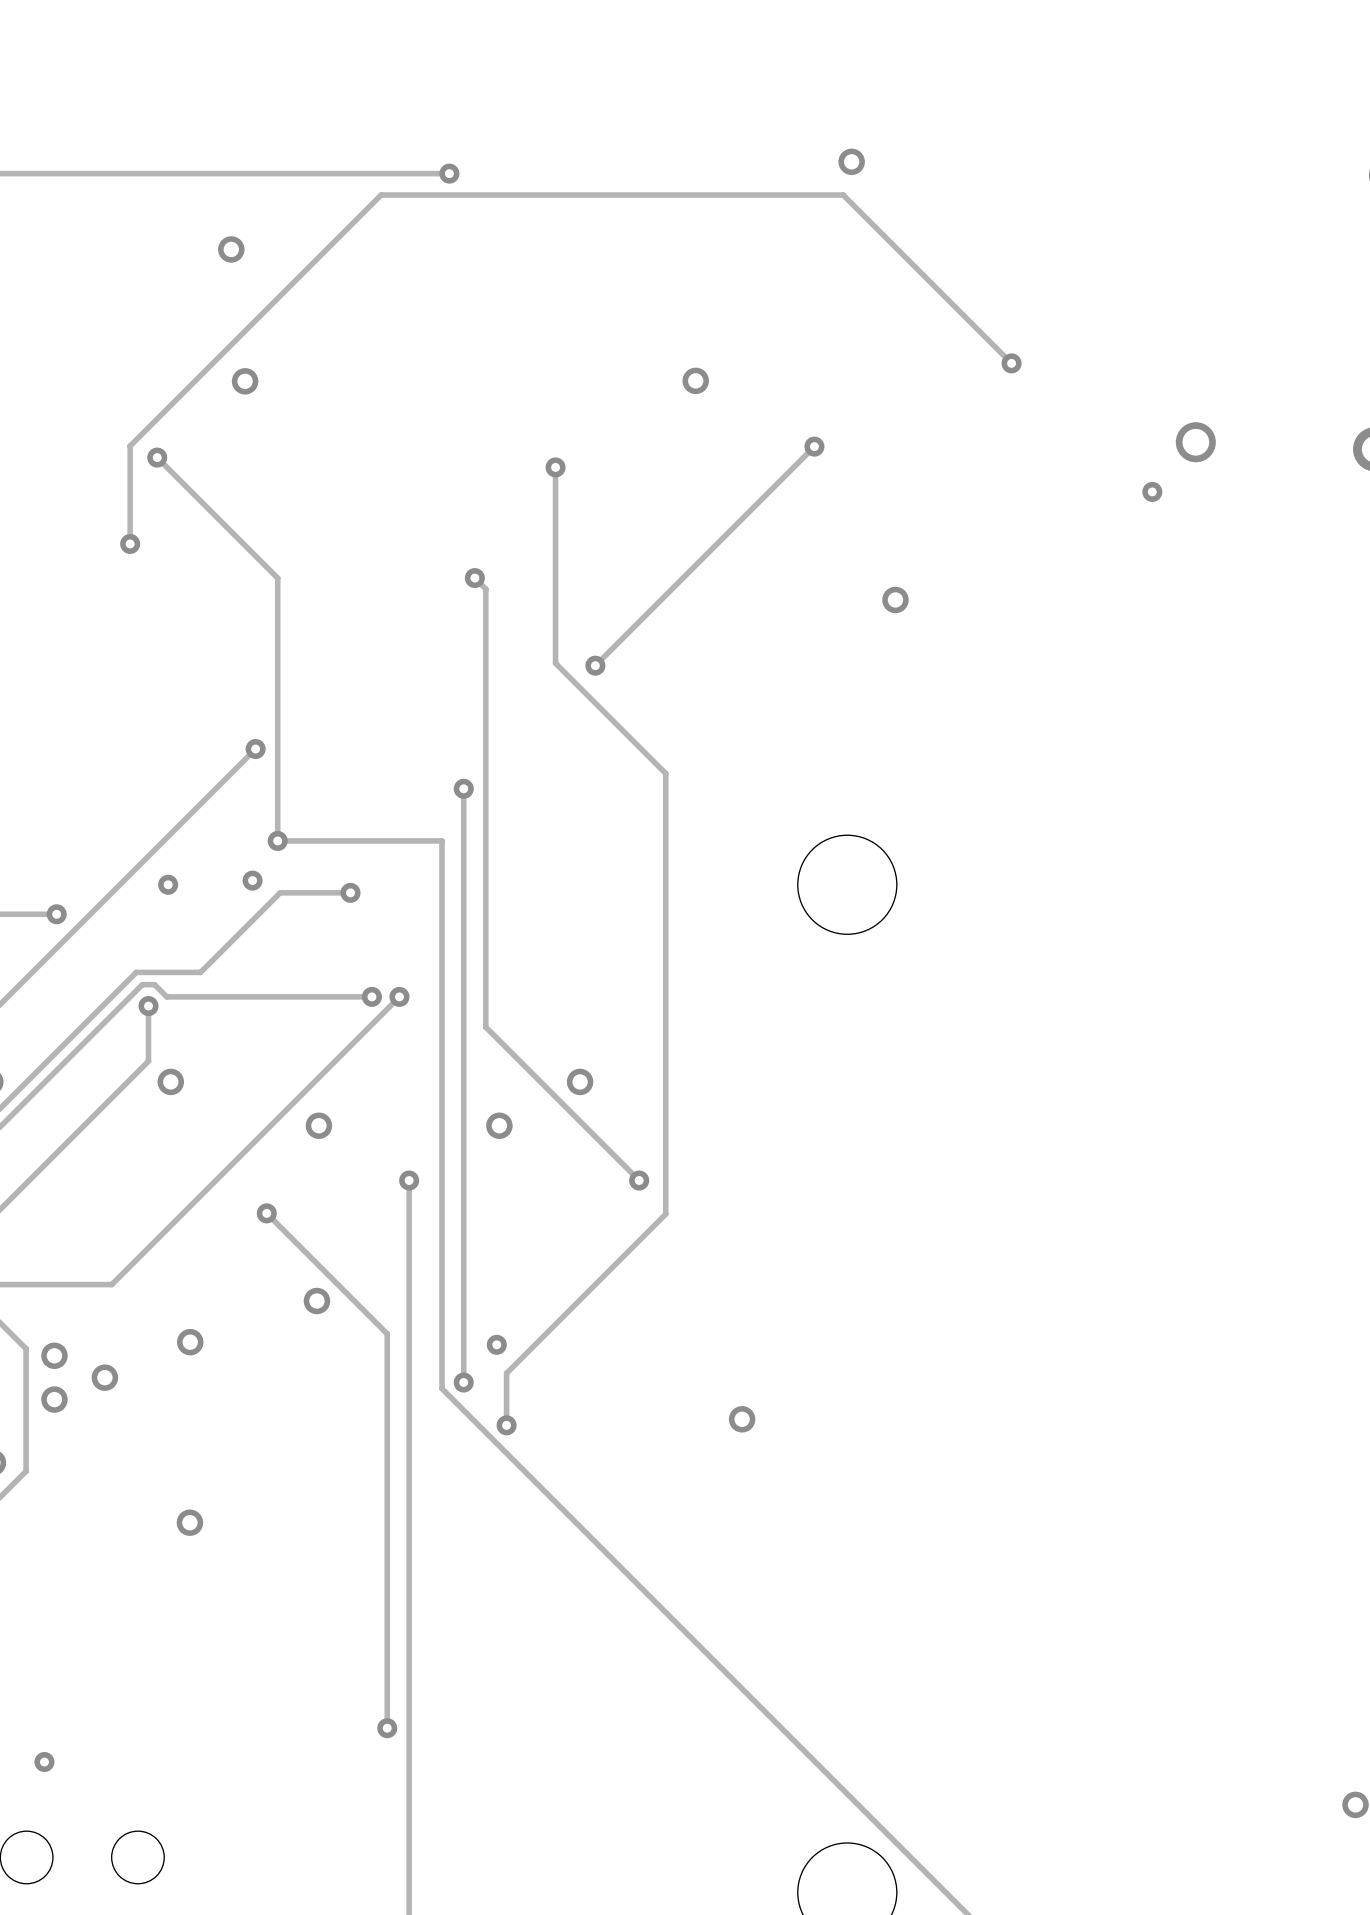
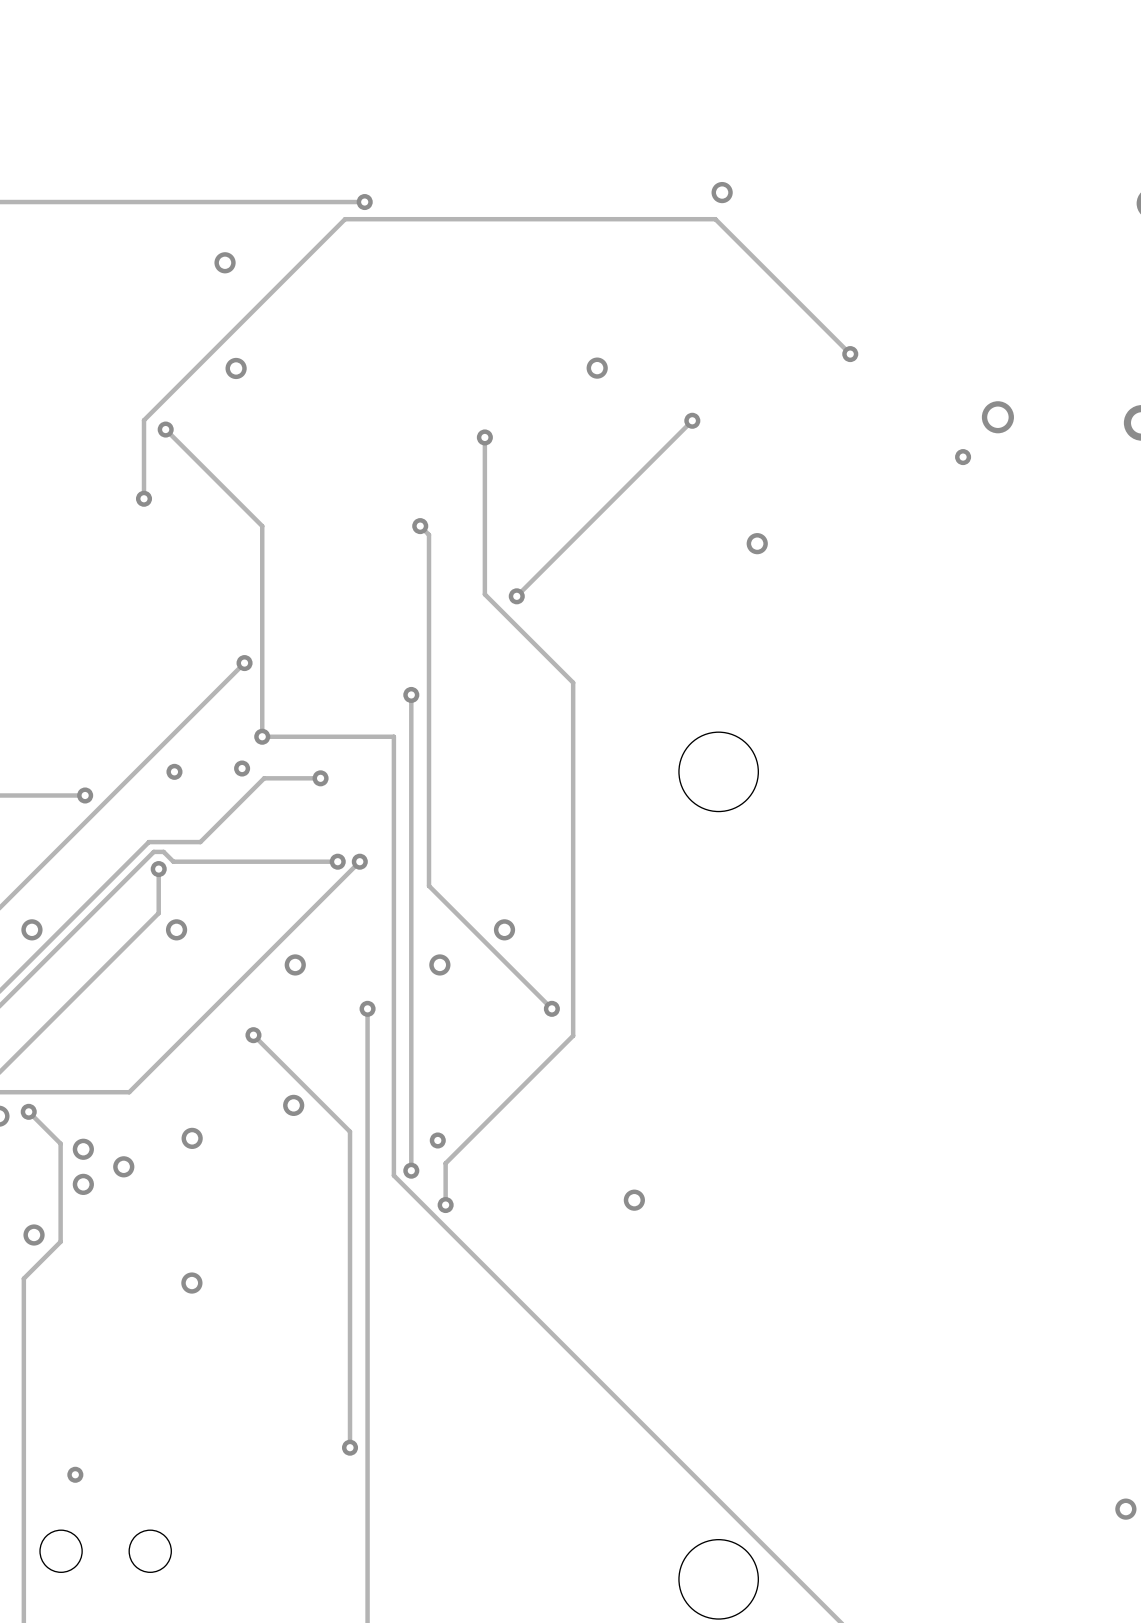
track: (449, 173) (405, 173) -> none
via position: (449, 173) -> (364, 202)

